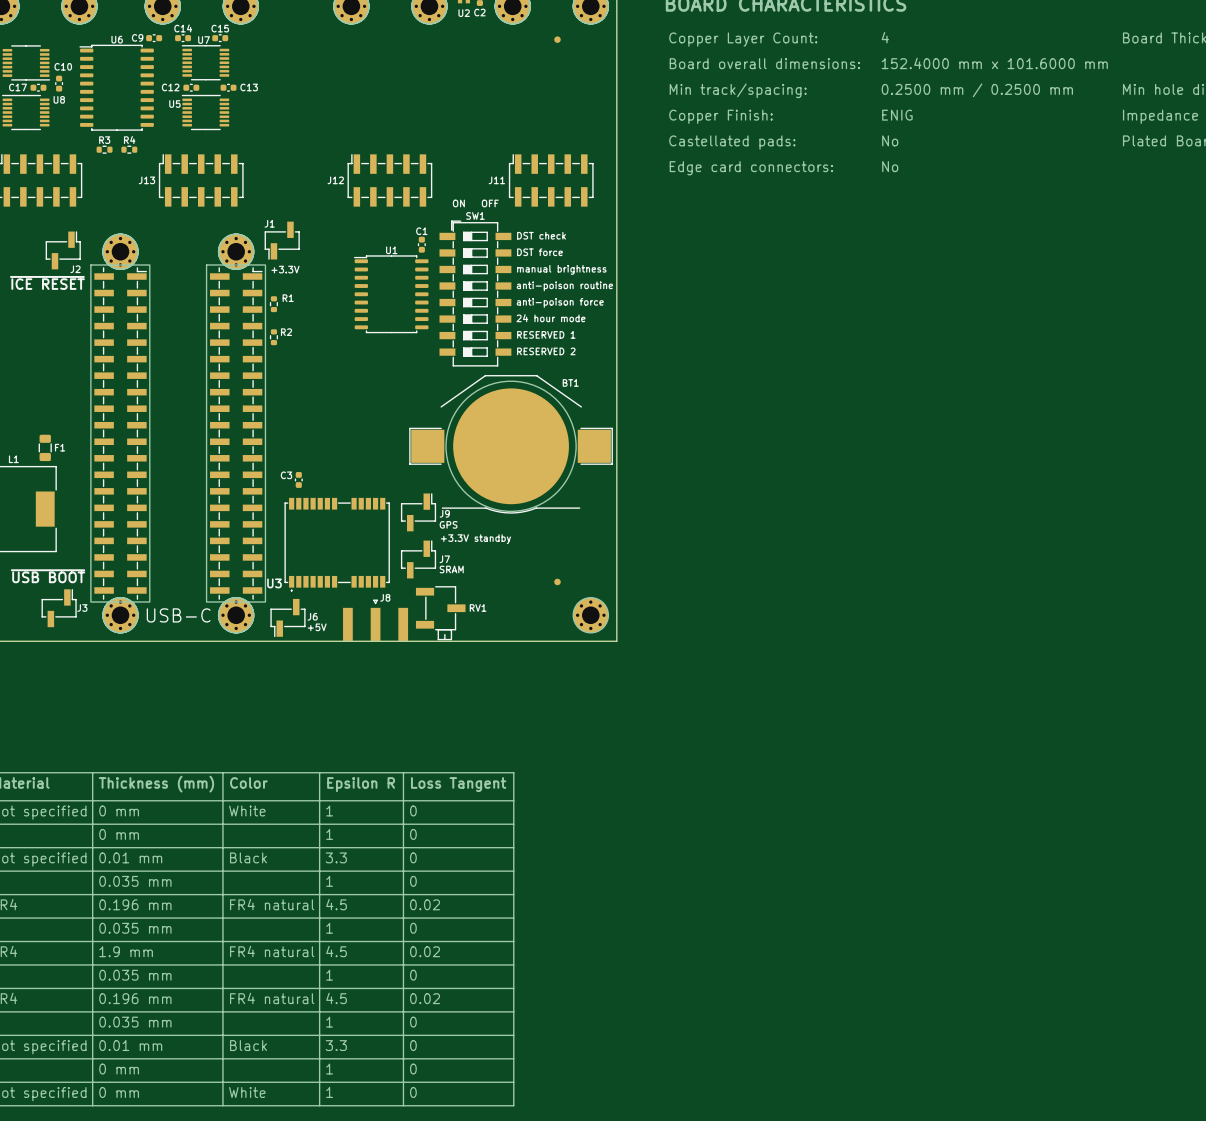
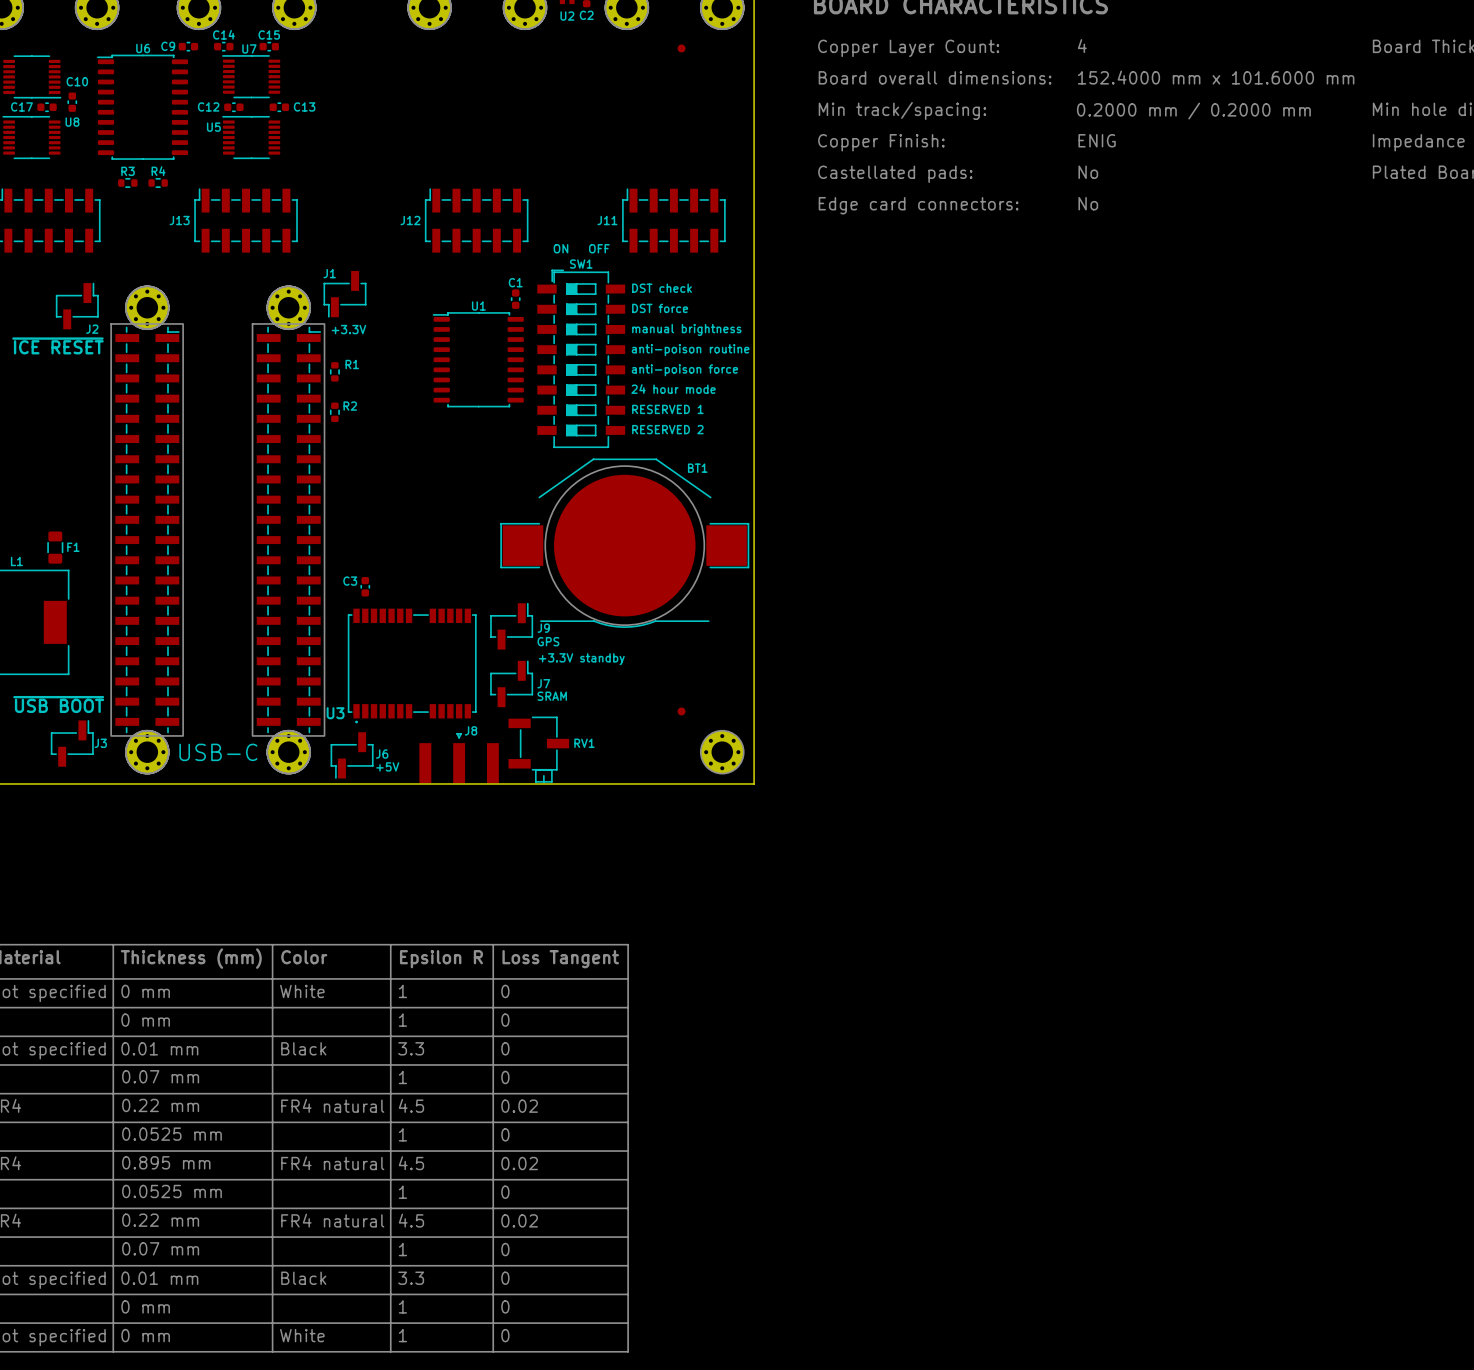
text: 0.2500 mm / 0.2500 mm (977, 90) -> 0.2000 mm / 0.2000 mm (1193, 111)
text: 0.035 mm (135, 881) -> 0.07 mm (160, 1076)
text: 0.196 mm (135, 904) -> 0.22 mm (160, 1105)
text: 0.035 mm (135, 928) -> 0.0525 mm (171, 1134)
text: 1.9 mm (126, 951) -> 0.895 mm (166, 1162)
text: 0.035 mm (135, 975) -> 0.0525 mm (171, 1191)
text: 0.196 mm (135, 998) -> 0.22 mm (160, 1220)
text: 0.035 mm (135, 1022) -> 0.07 mm (160, 1248)

